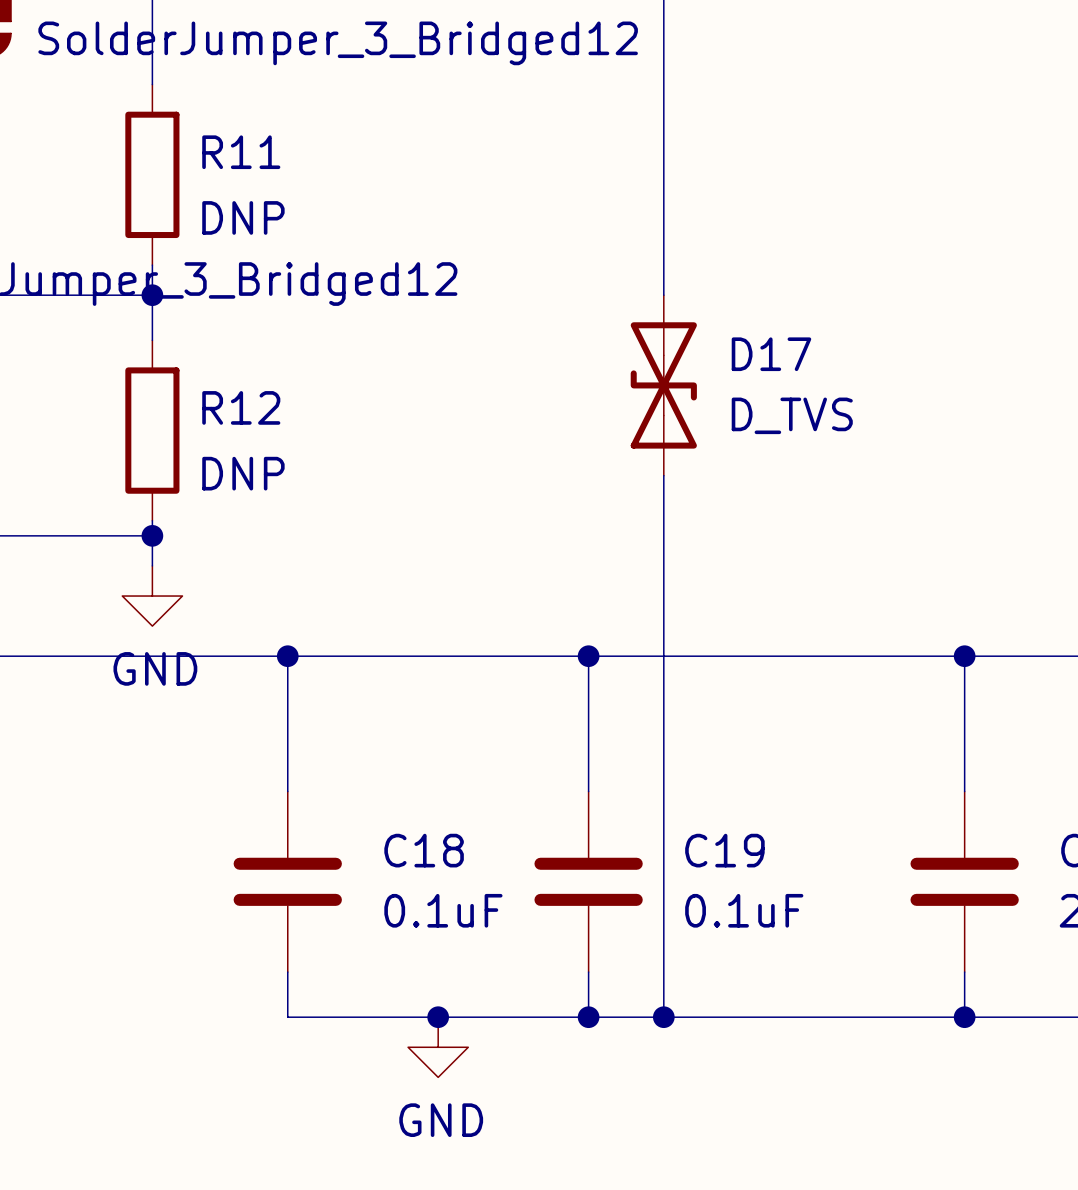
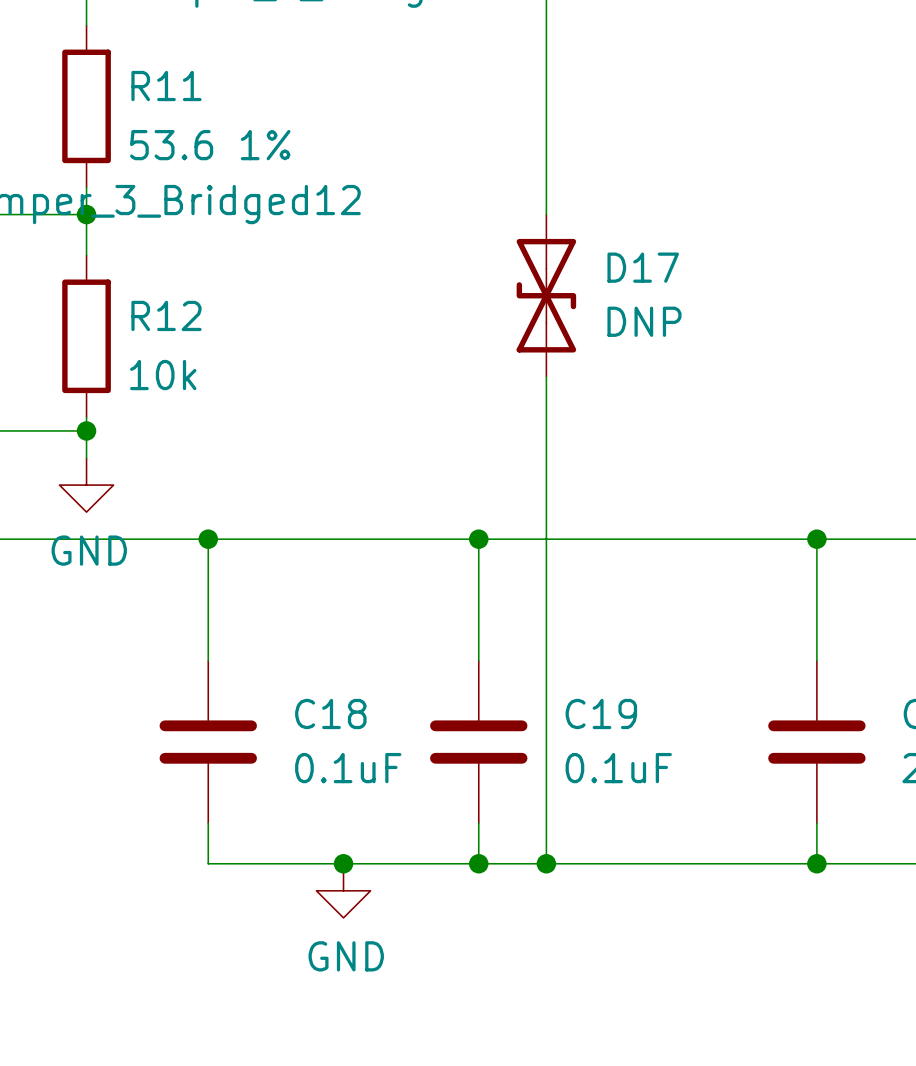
R11 value: DNP (243, 217) -> 53.6 1% (210, 145)
D17 value: D_TVS (792, 415) -> DNP (644, 321)
R12 value: DNP (243, 473) -> 10k (163, 375)

